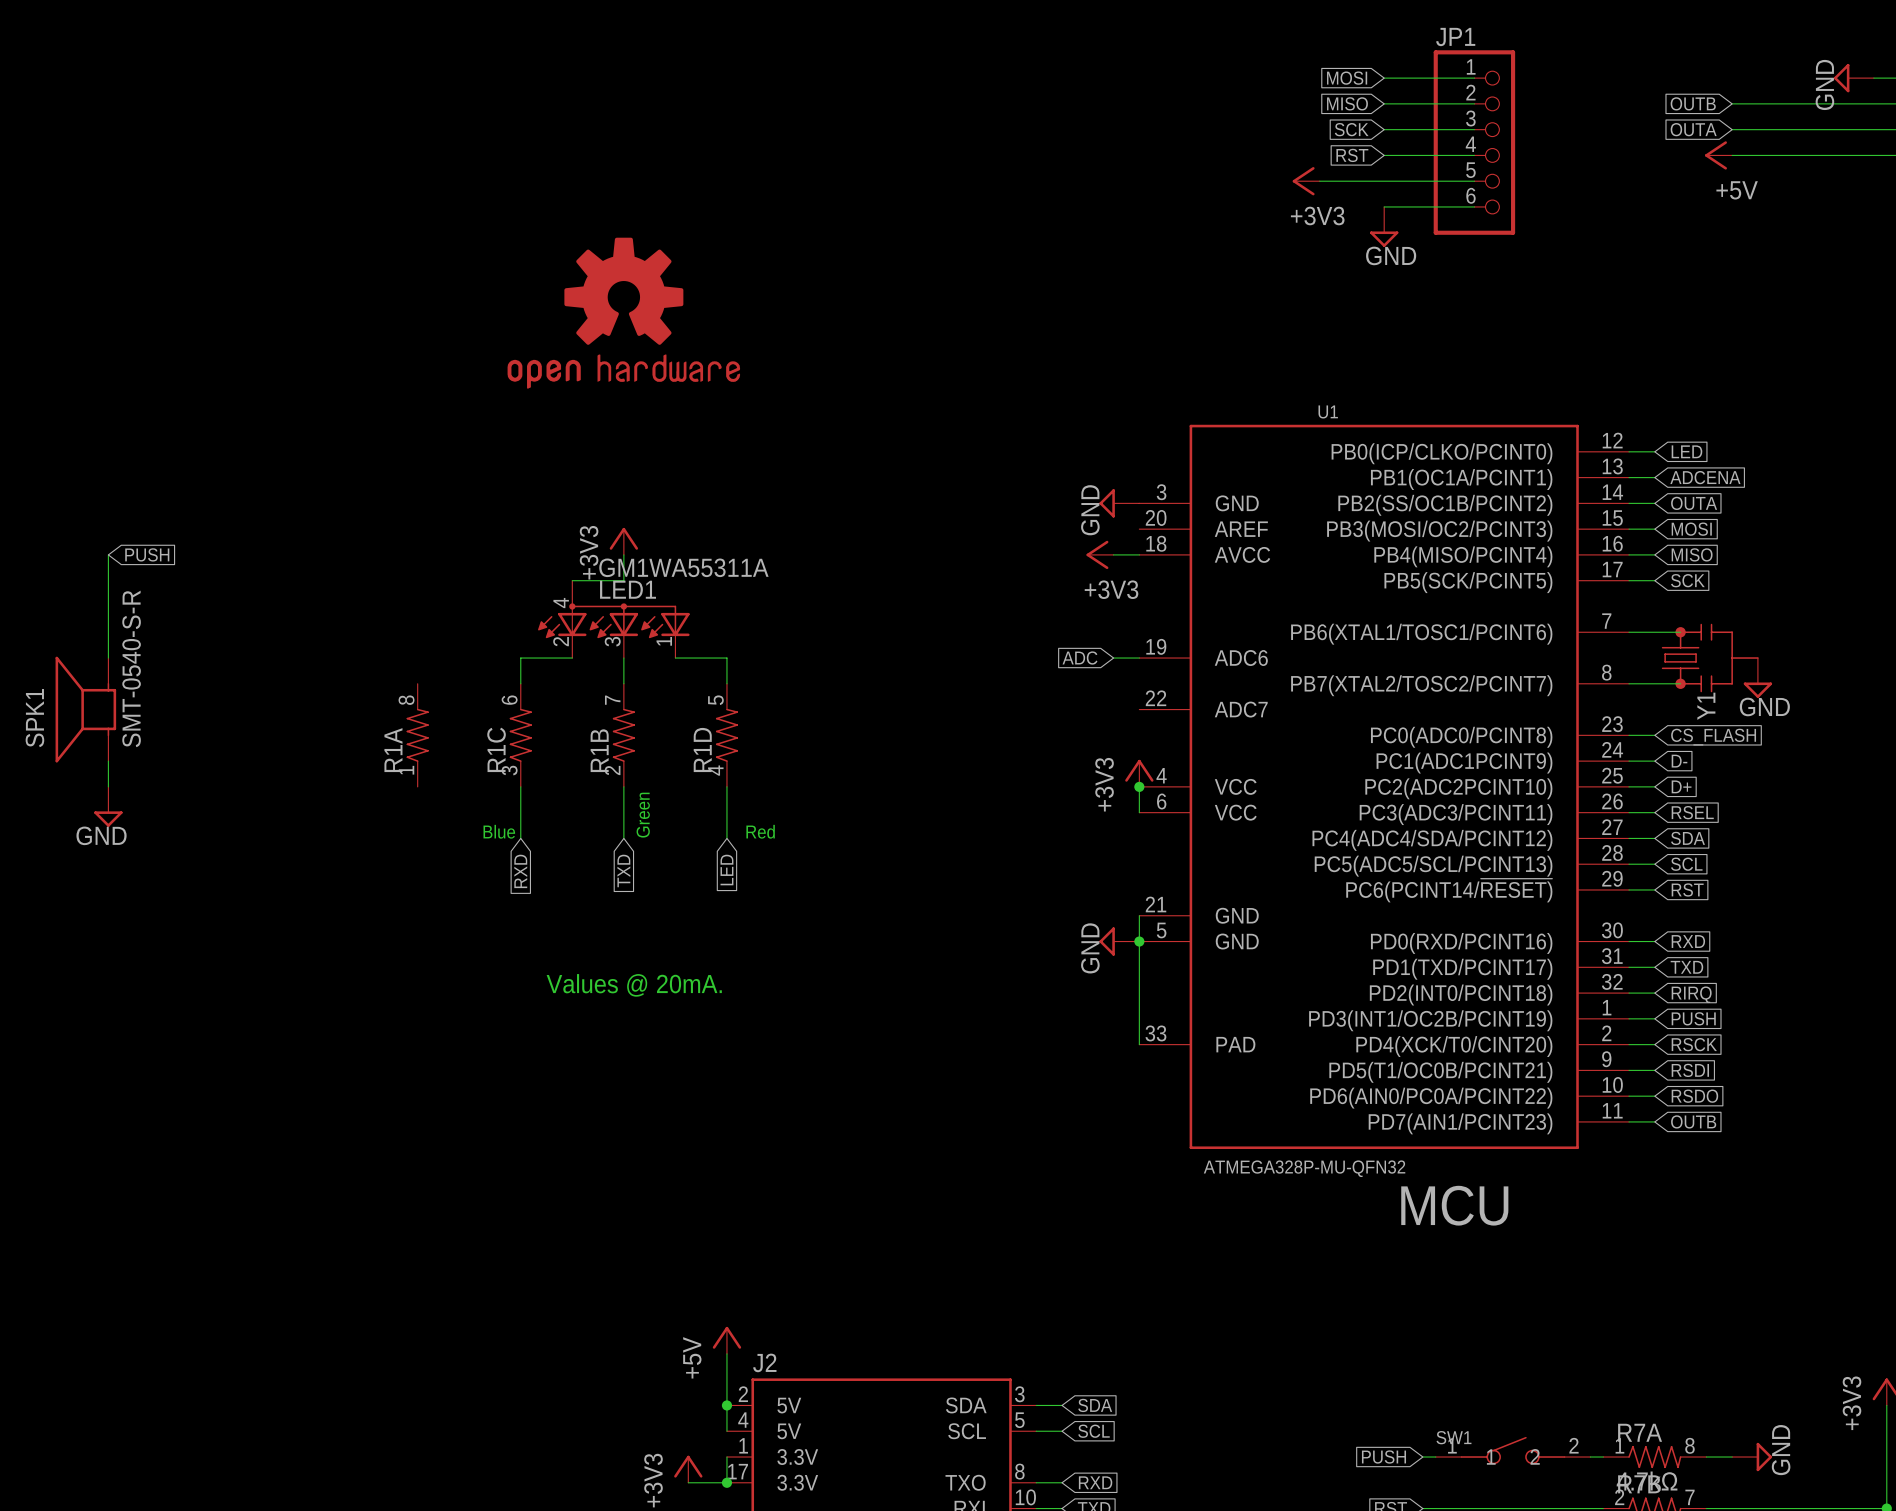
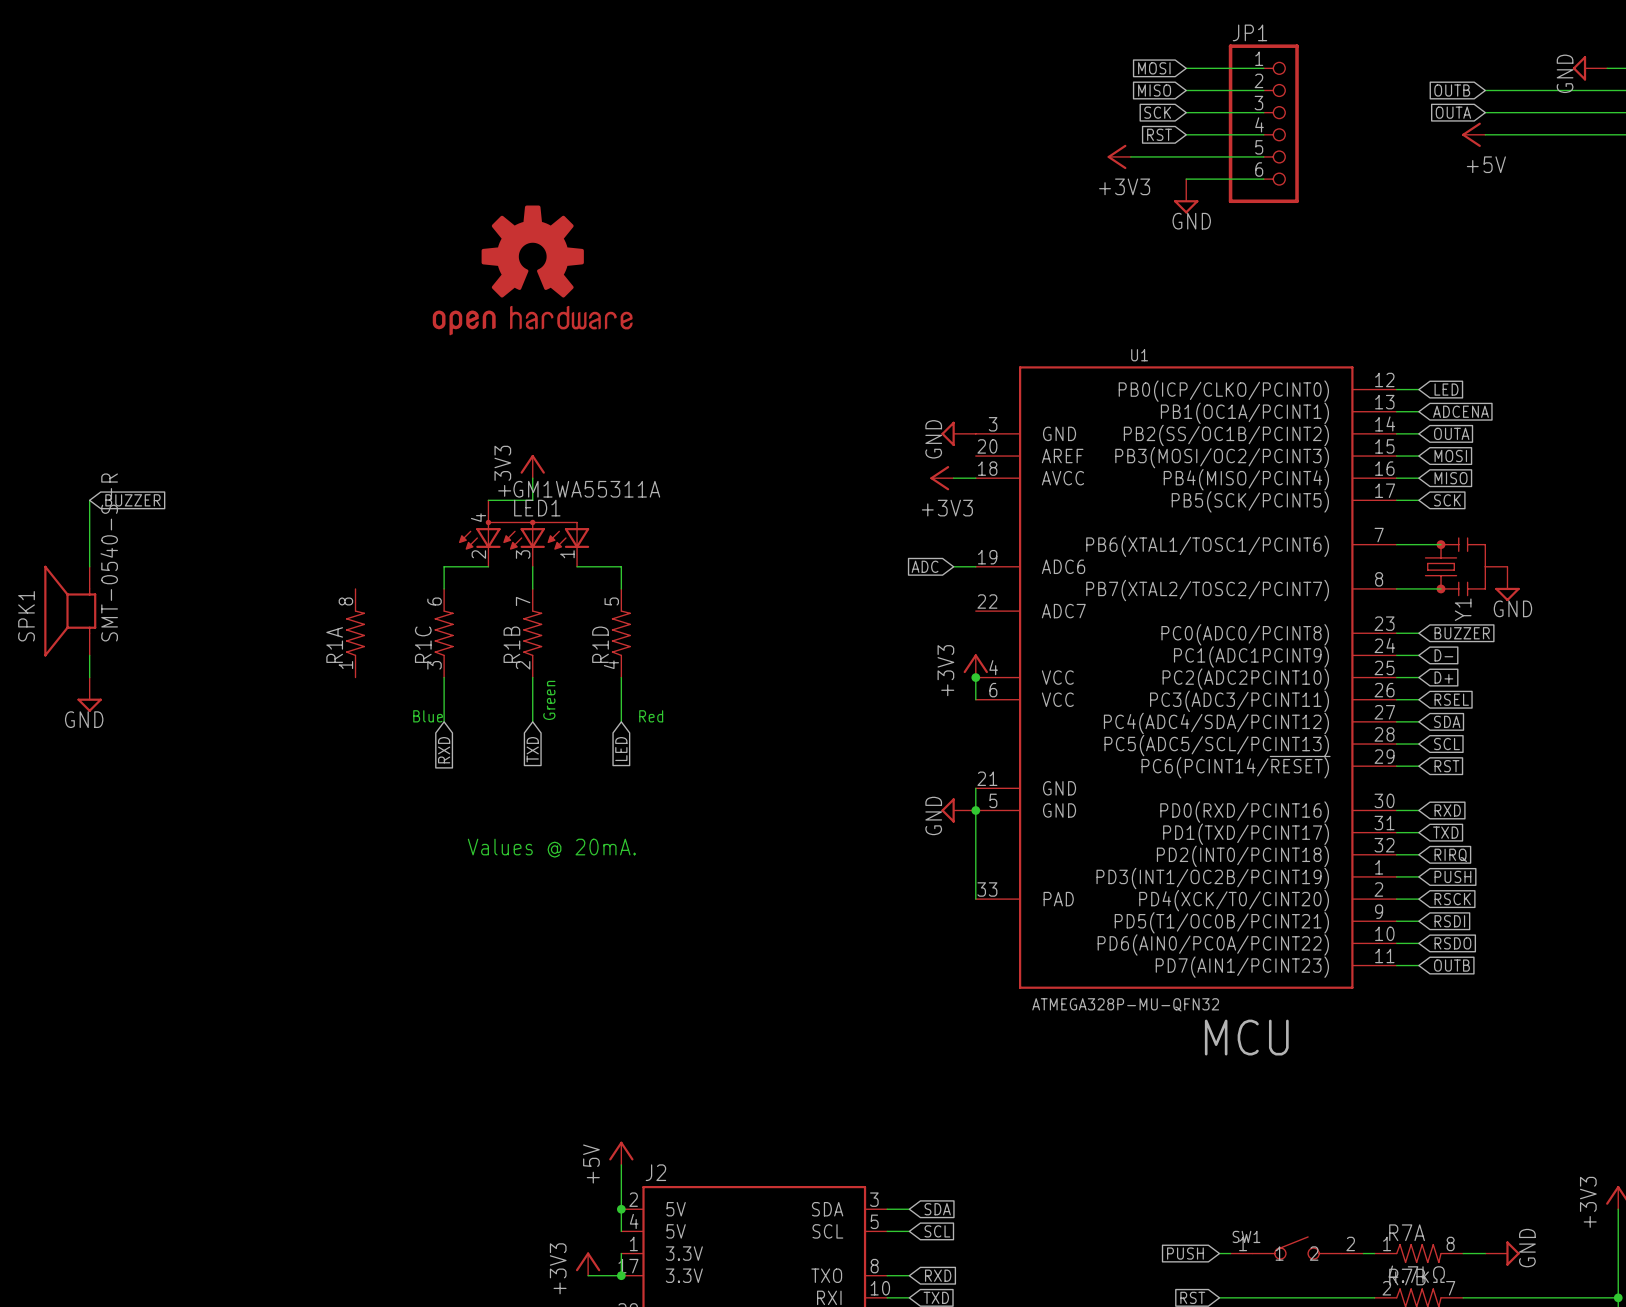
wire: (108, 554) (108, 580) -> none
global label: PUSH (147, 554) -> none
global label: none -> BUZZER (132, 500)
global label: CS_FLASH (1713, 737) -> BUZZER (1462, 633)

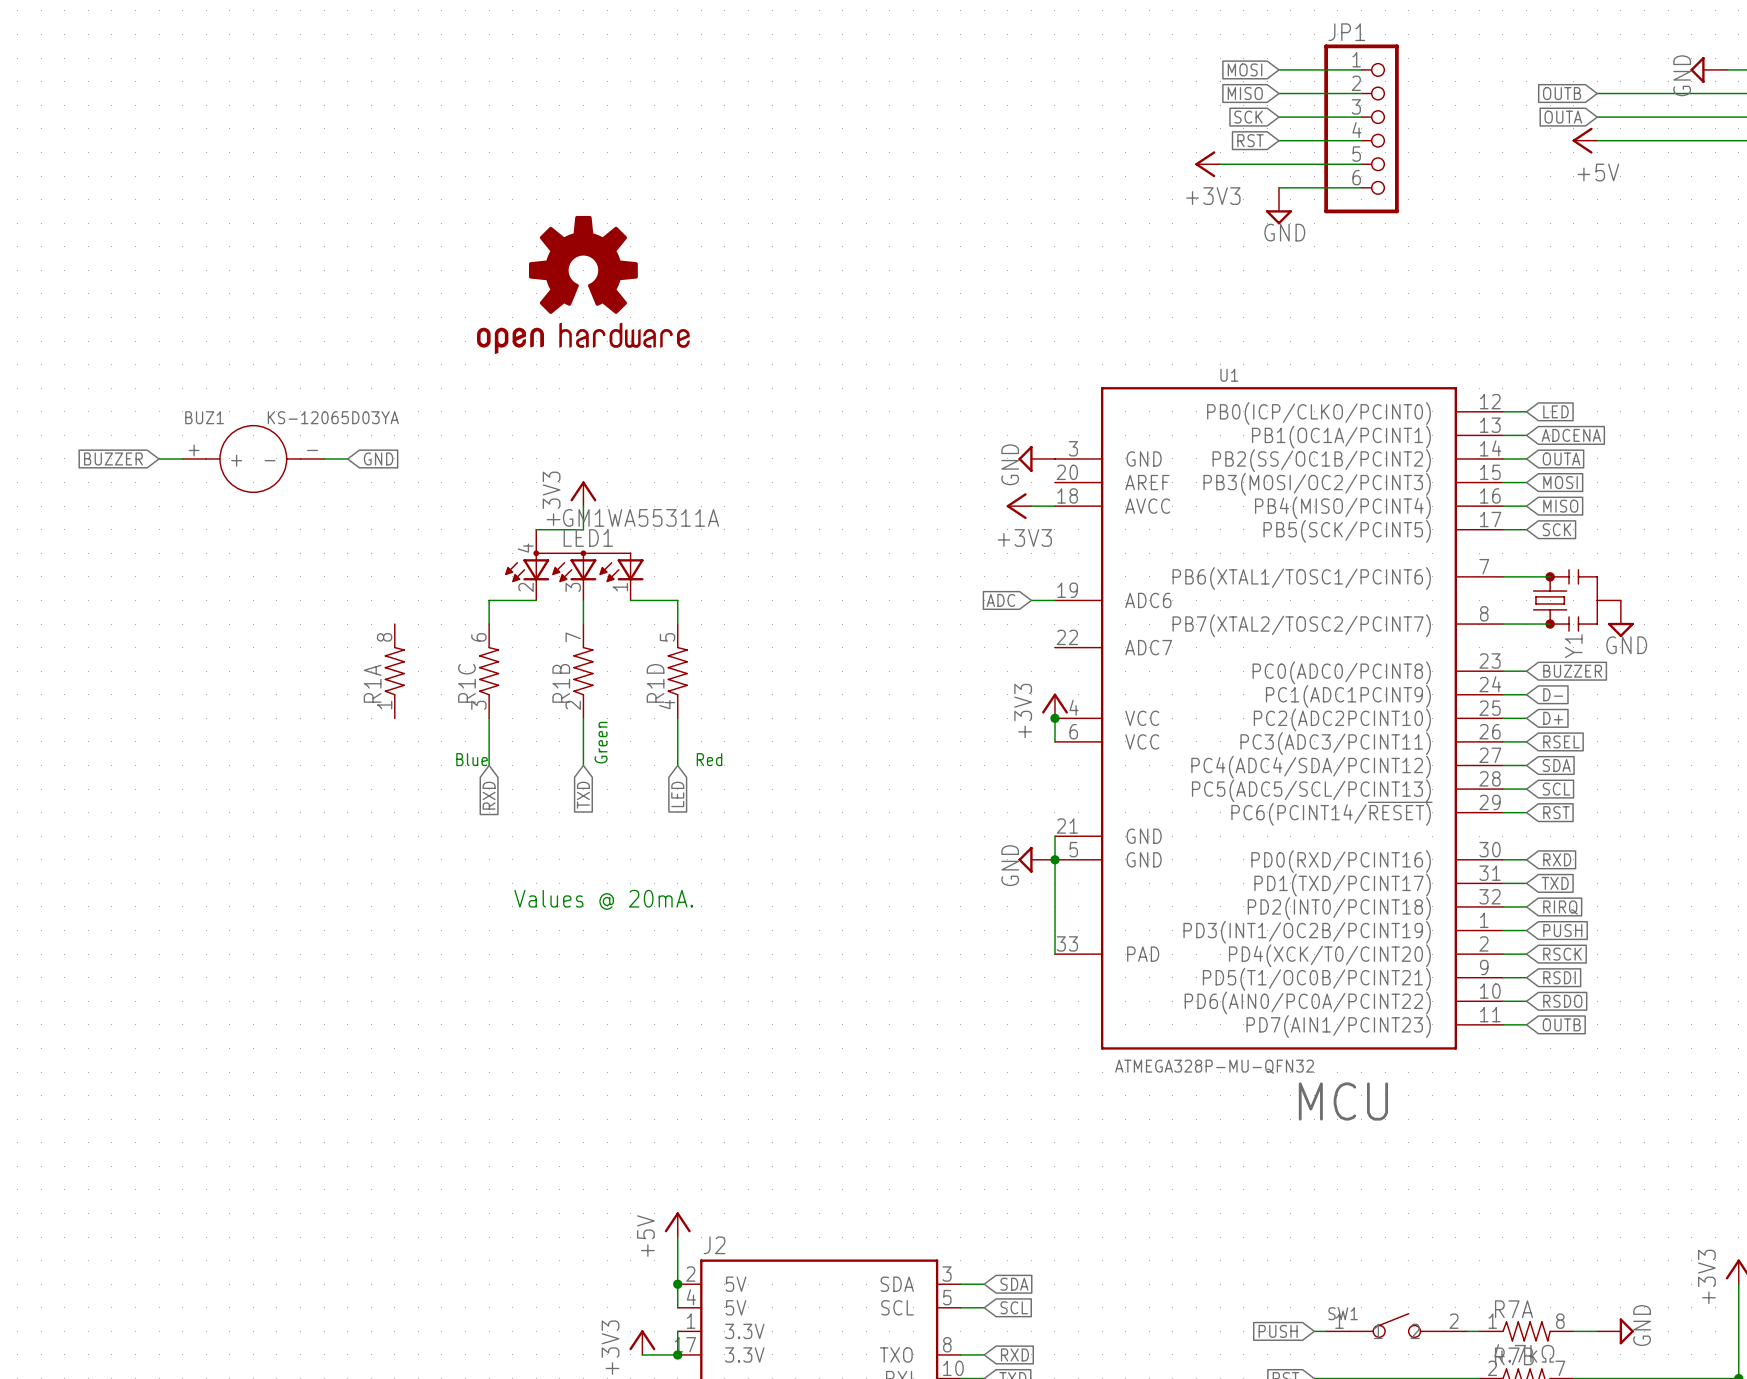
wire: none -> (159, 458) (182, 458)
BUZ1: none -> KS-12065D03YA (253, 458)
wire: none -> (324, 458) (347, 458)
global label: none -> GND (378, 458)
wire: (89, 500) (89, 566) -> none
global label rotation: 0° (132, 500) -> 180° (113, 458)
SPK1: SMT-0540-S-R (70, 611) -> none
wire: (89, 655) (89, 677) -> none
power symbol: GND (89, 694) -> none

